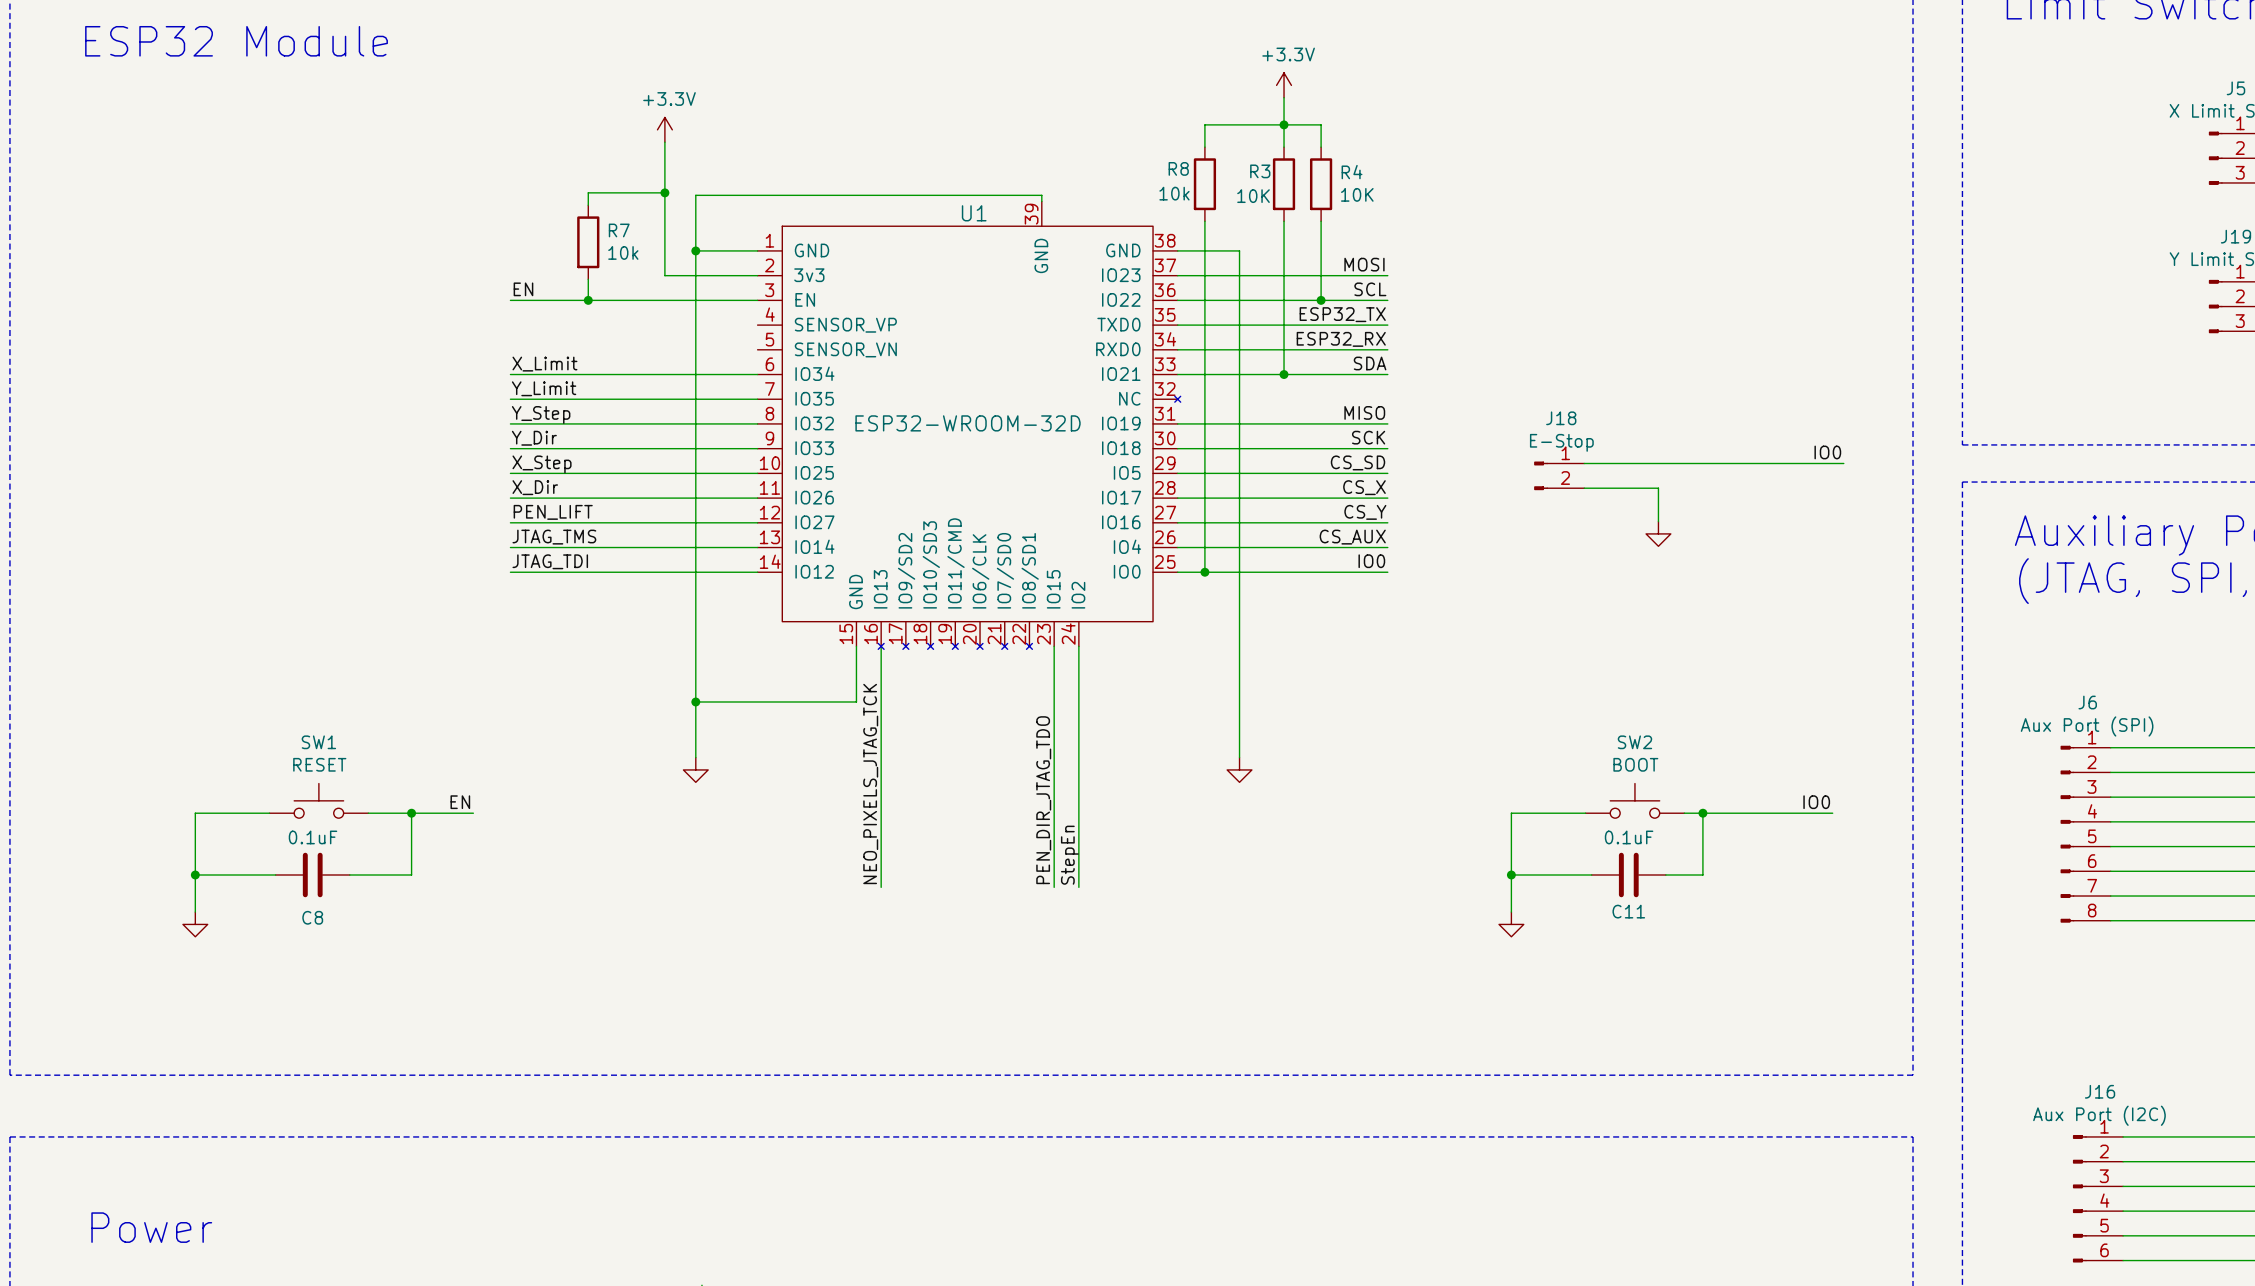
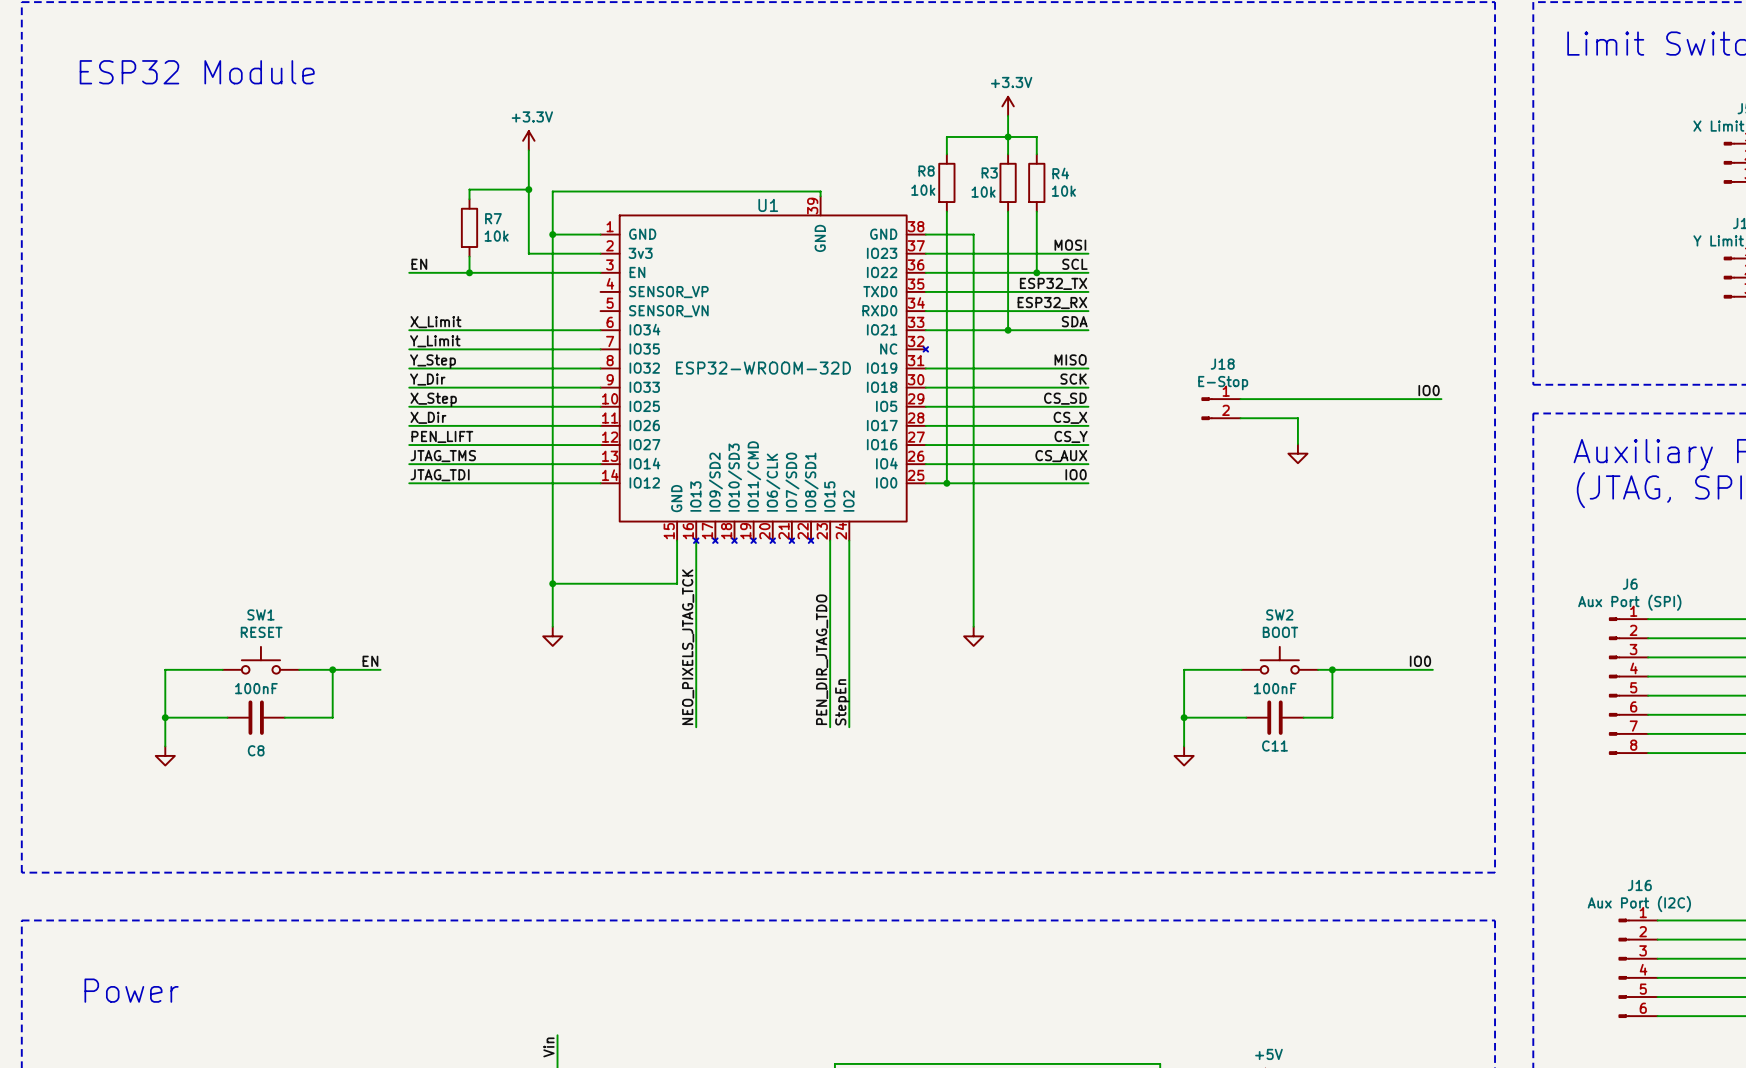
R4 value: 10K (1357, 194) -> 10k (1063, 191)
R3 value: 10K (1253, 196) -> 10k (983, 192)
C8 value: 0.1uF (313, 837) -> 100nF (256, 688)
C11 value: 0.1uF (1629, 837) -> 100nF (1275, 688)

